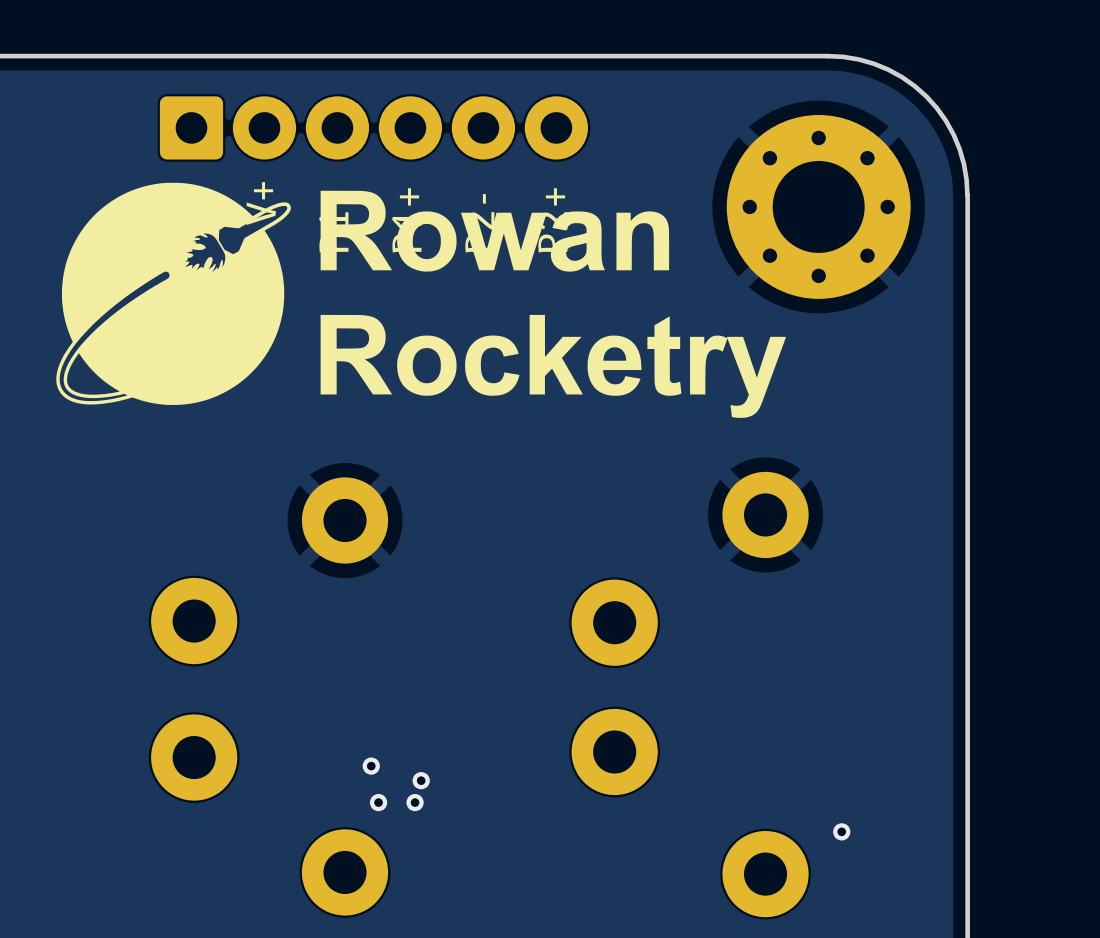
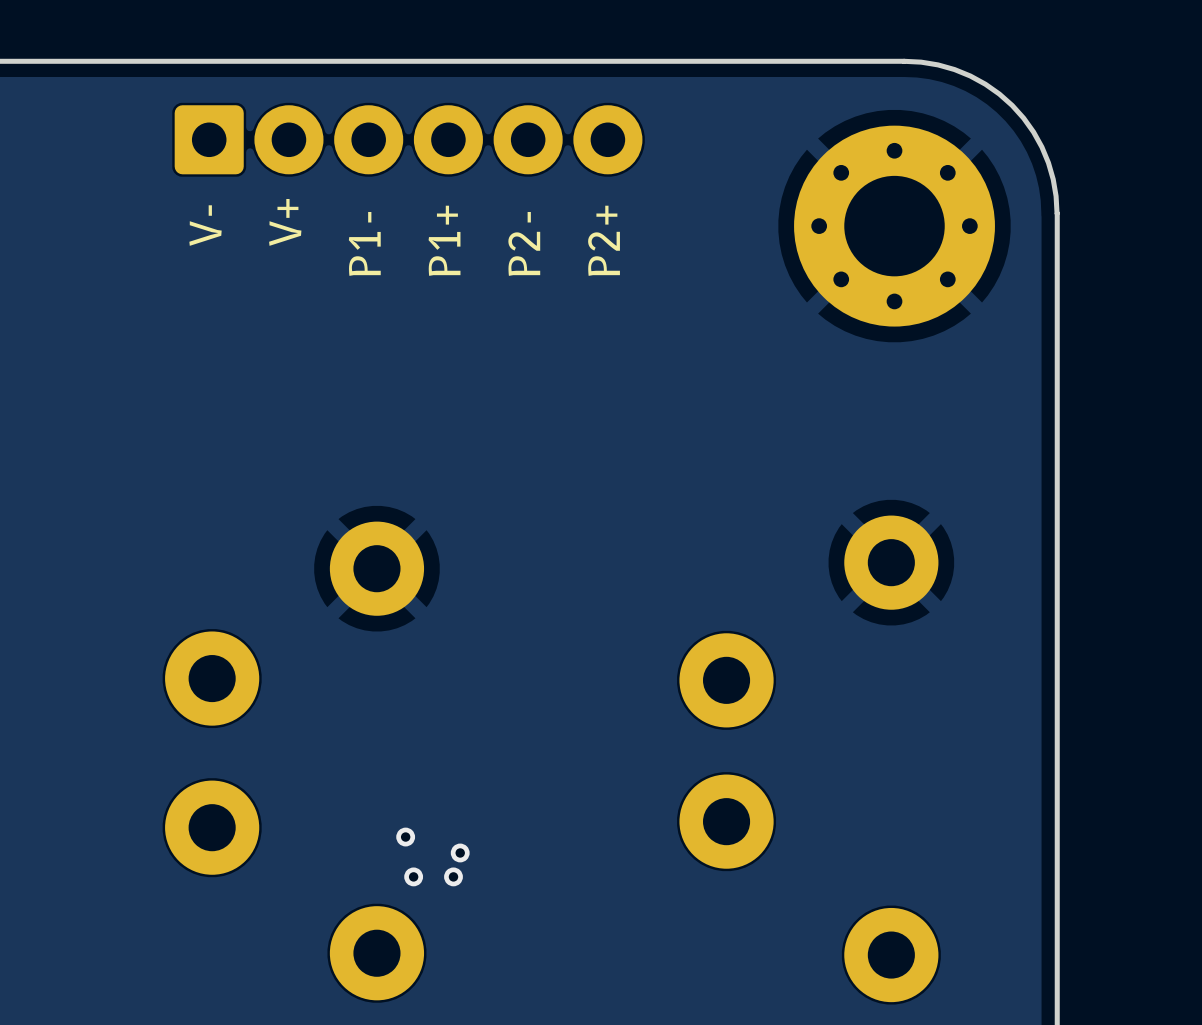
drawing: [56, 182, 787, 418] -> none
part position: (765, 514) -> (891, 562)
part position: (614, 622) -> (726, 680)
part position: (614, 752) -> (726, 821)
via: (841, 831) -> none
part position: (765, 874) -> (891, 955)

